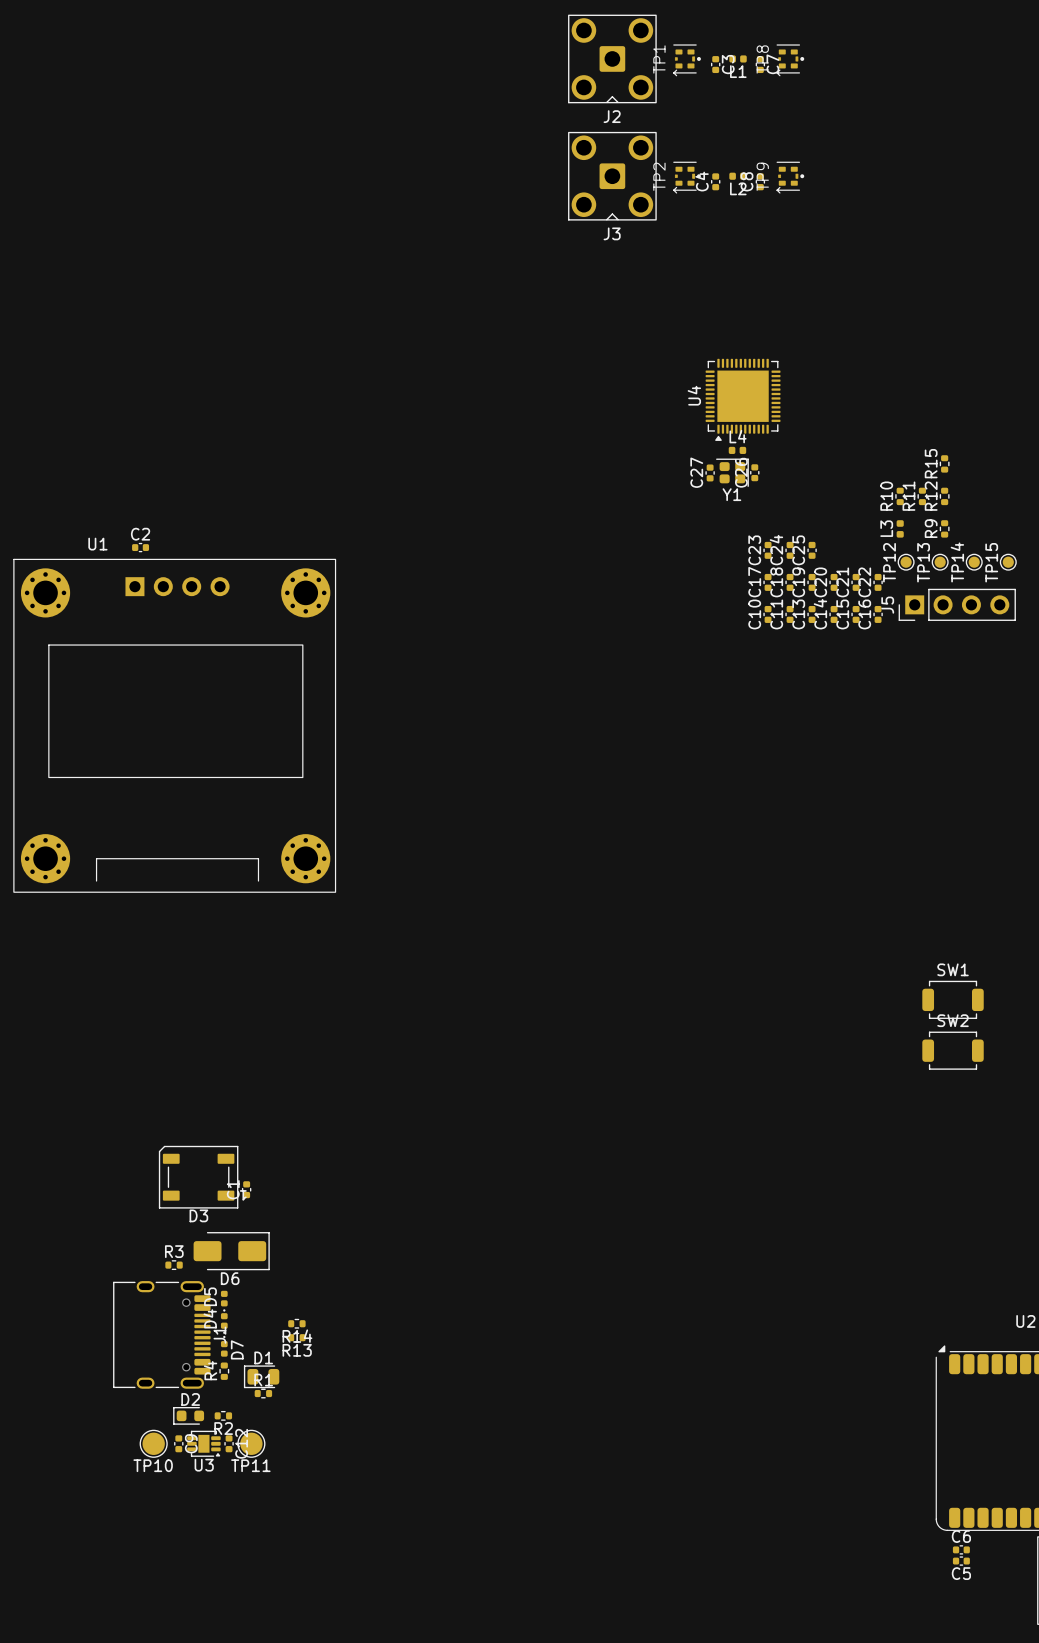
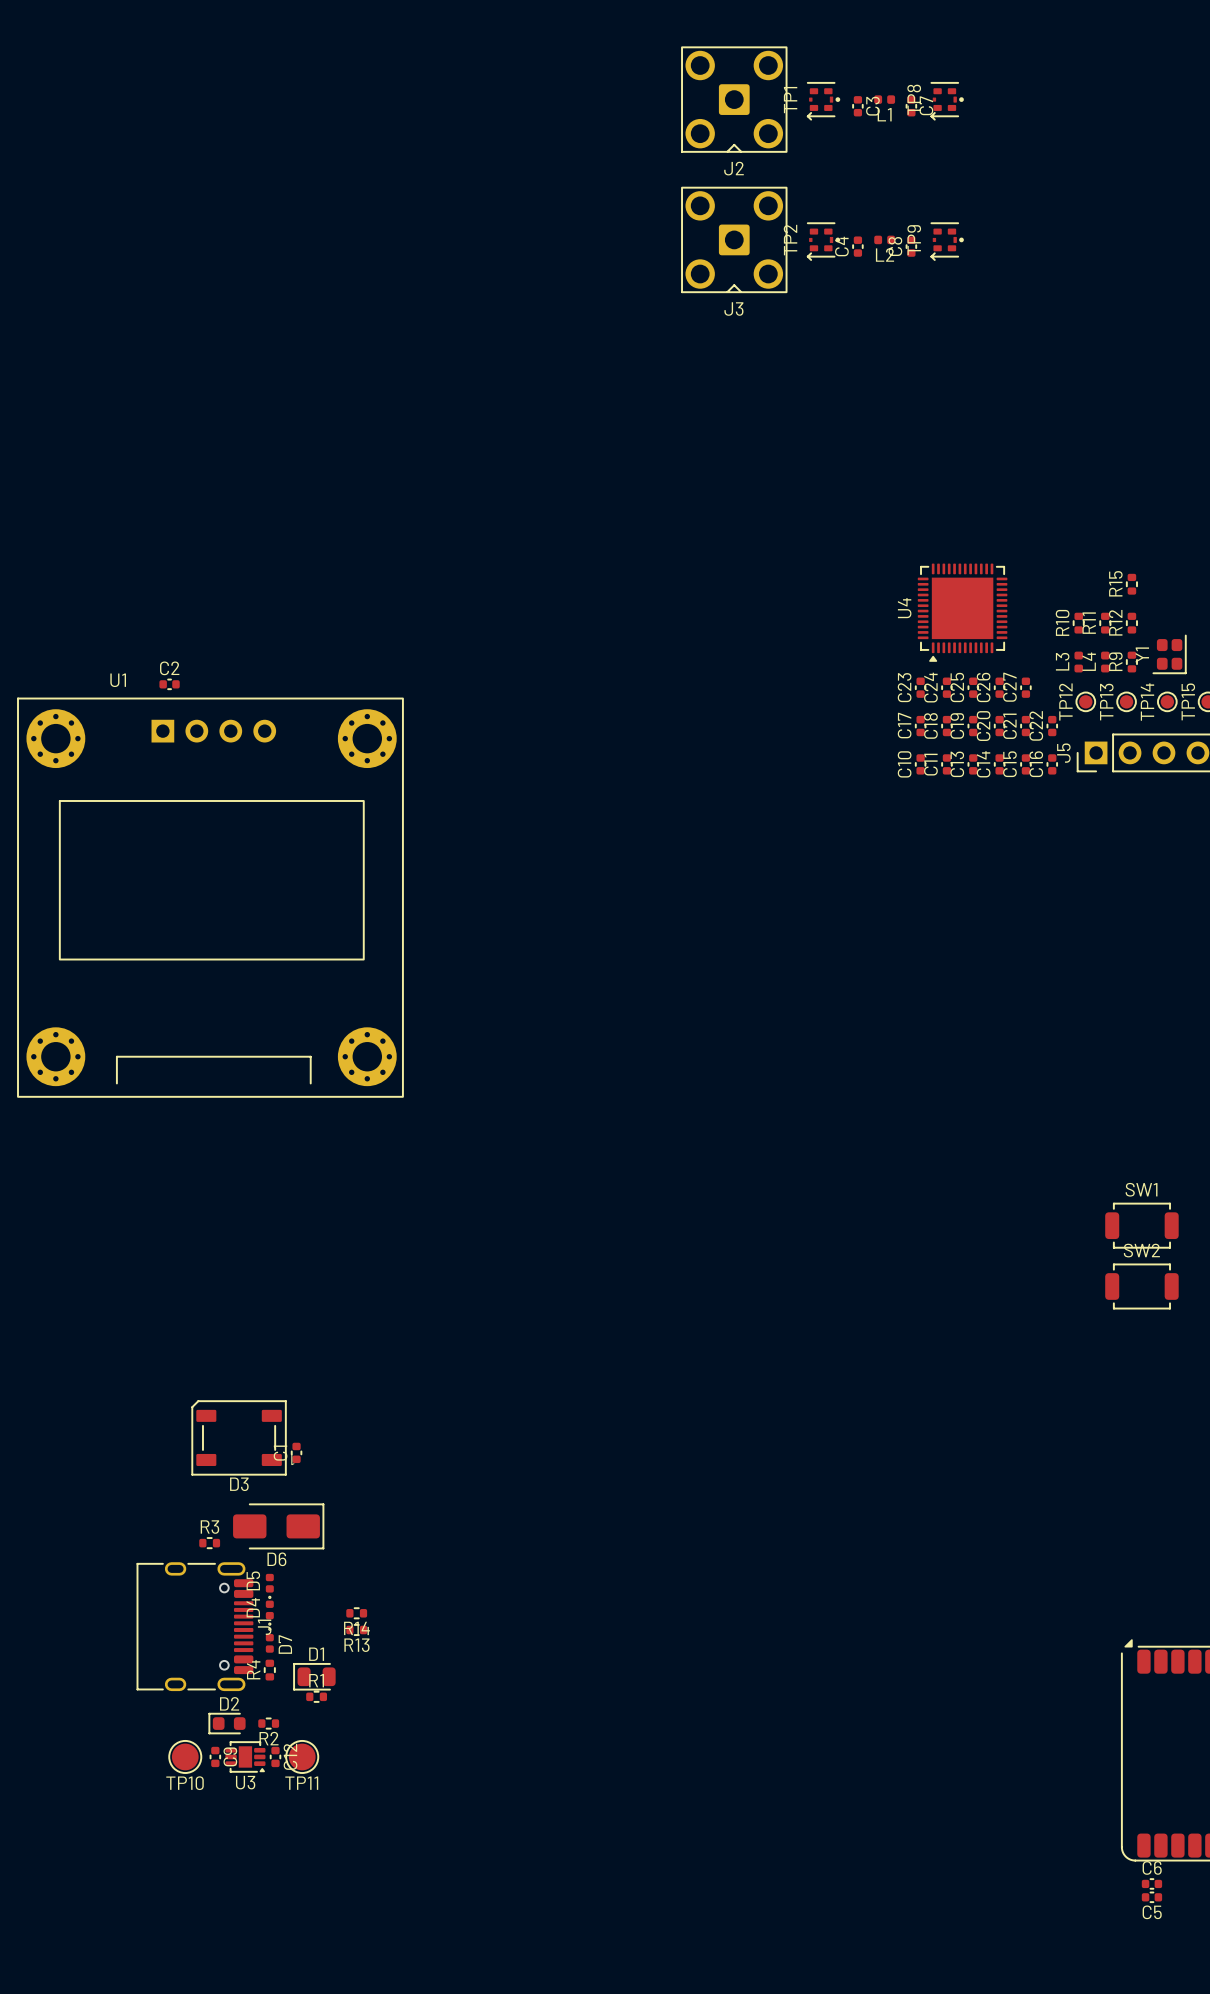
U4 position: (743, 399) -> (962, 612)
L4 rotation: 0° (737, 450) -> 90° clockwise (1105, 662)
L4 position: (737, 450) -> (1105, 662)
C27 position: (710, 472) -> (1025, 687)
Y1 rotation: 0° (732, 472) -> 90° clockwise (1169, 654)
Y1 position: (732, 472) -> (1169, 654)
C26 position: (754, 472) -> (999, 687)

